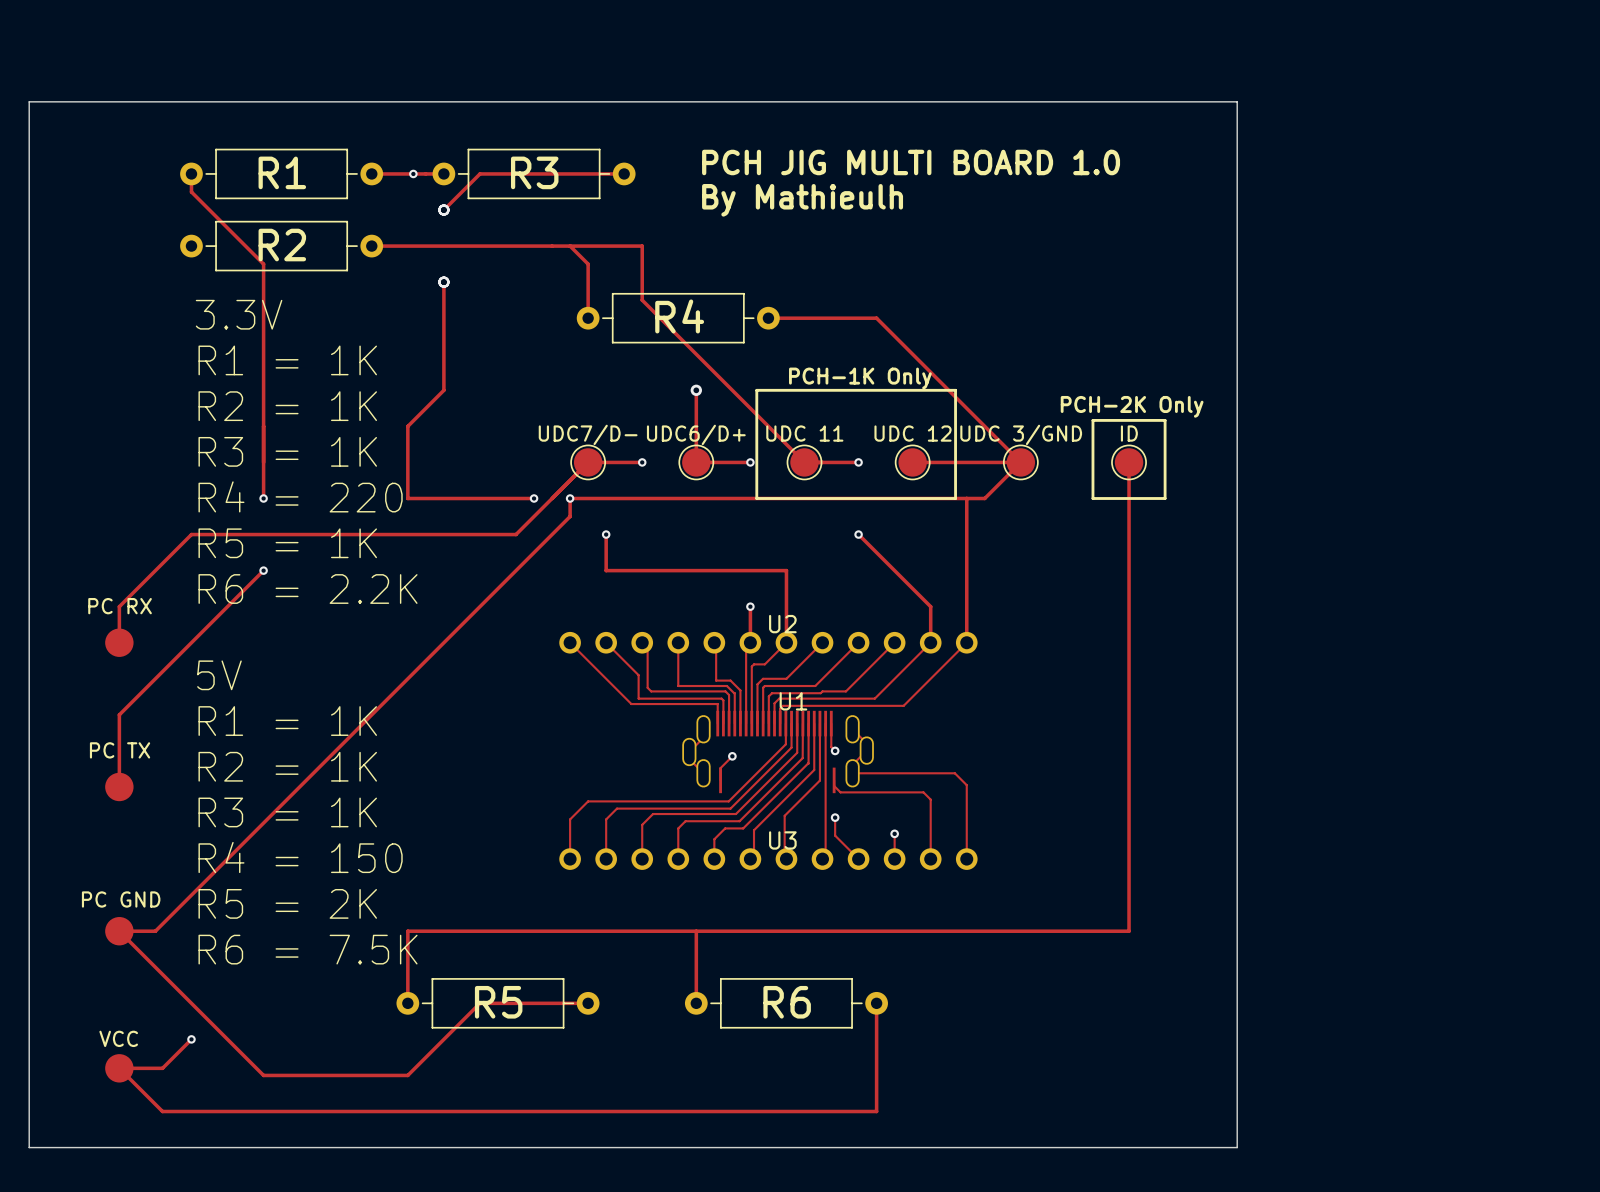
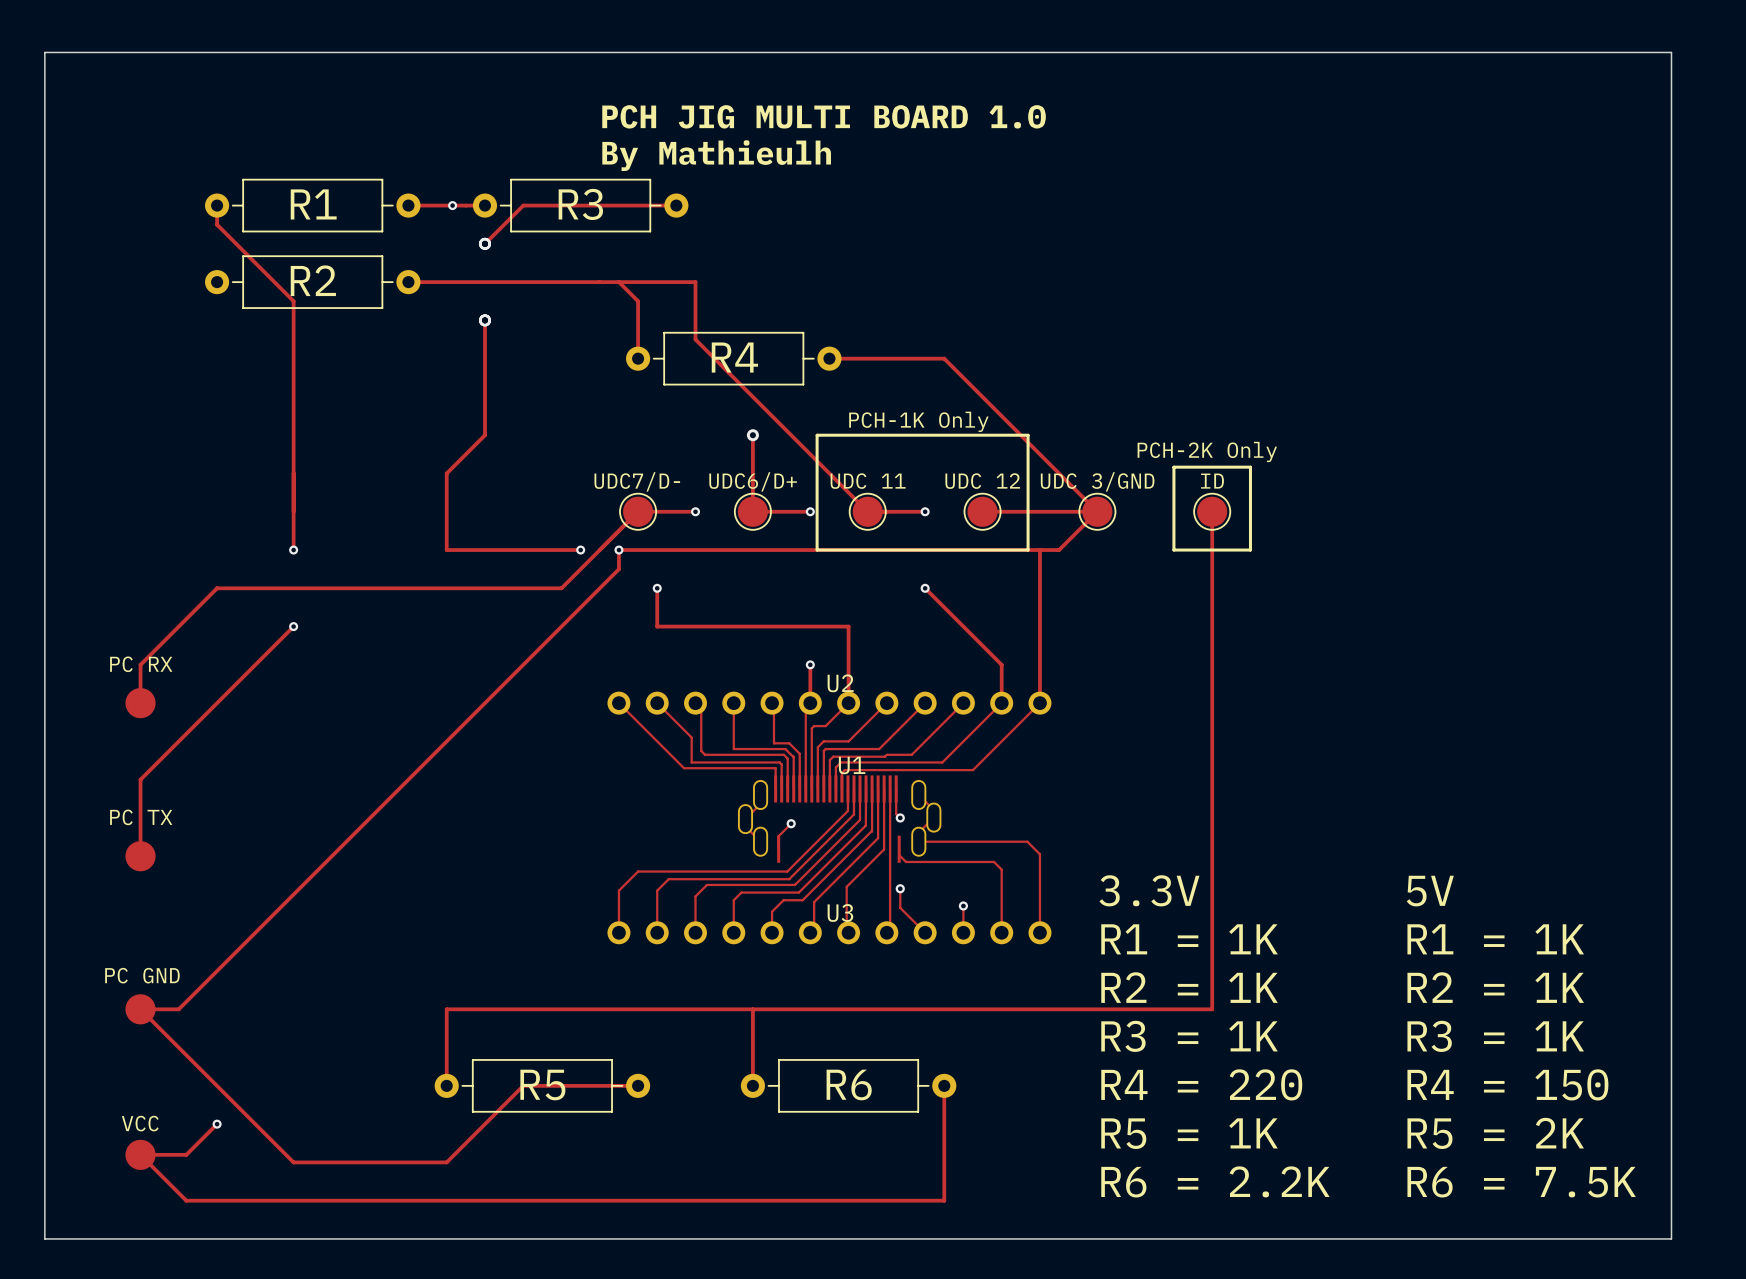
board edge: (29, 101) (1237, 101) (1237, 1147) -> (44, 129) (44, 52) (1671, 52) (1671, 1238) (1327, 1238)
text position: PCH JIG MULTI BOARD 1.0 (911, 162) -> PCH JIG MULTI BOARD 1.0 (824, 116)
text position: By Mathieulh (802, 200) -> By Mathieulh (716, 155)
text: 3.3V (239, 314) -> none
text: R1 = 1K (287, 360) -> none
text: R2 = 1K (287, 406) -> none
text: R3 = 1K (287, 451) -> none
text: R4 = 220 (300, 496) -> none
text: R5 = 1K (287, 543) -> none
text: R6 = 2.2K (308, 589) -> none
text: 5V (219, 675) -> none
text: R1 = 1K (287, 721) -> none
text: R2 = 1K (287, 766) -> none
text: R3 = 1K (287, 812) -> none
text: none -> 3.3V (1149, 890)
text: none -> 5V (1430, 891)
text: R4 = 150 (300, 857) -> none
text: none -> R1 = 1K (1189, 939)
text: none -> R1 = 1K (1495, 939)
text: R5 = 2K (287, 903) -> none
text: none -> R2 = 1K (1189, 987)
text: none -> R2 = 1K (1495, 987)
text: R6 = 7.5K (308, 949) -> none
text: none -> R3 = 1K (1189, 1036)
text: none -> R3 = 1K (1495, 1036)
text: none -> R4 = 220 (1201, 1084)
text: none -> R4 = 150 (1507, 1084)
text: none -> R5 = 1K (1189, 1133)
text: none -> R5 = 2K (1495, 1133)
text: none -> R6 = 2.2K (1215, 1181)
text: none -> R6 = 7.5K (1521, 1182)

